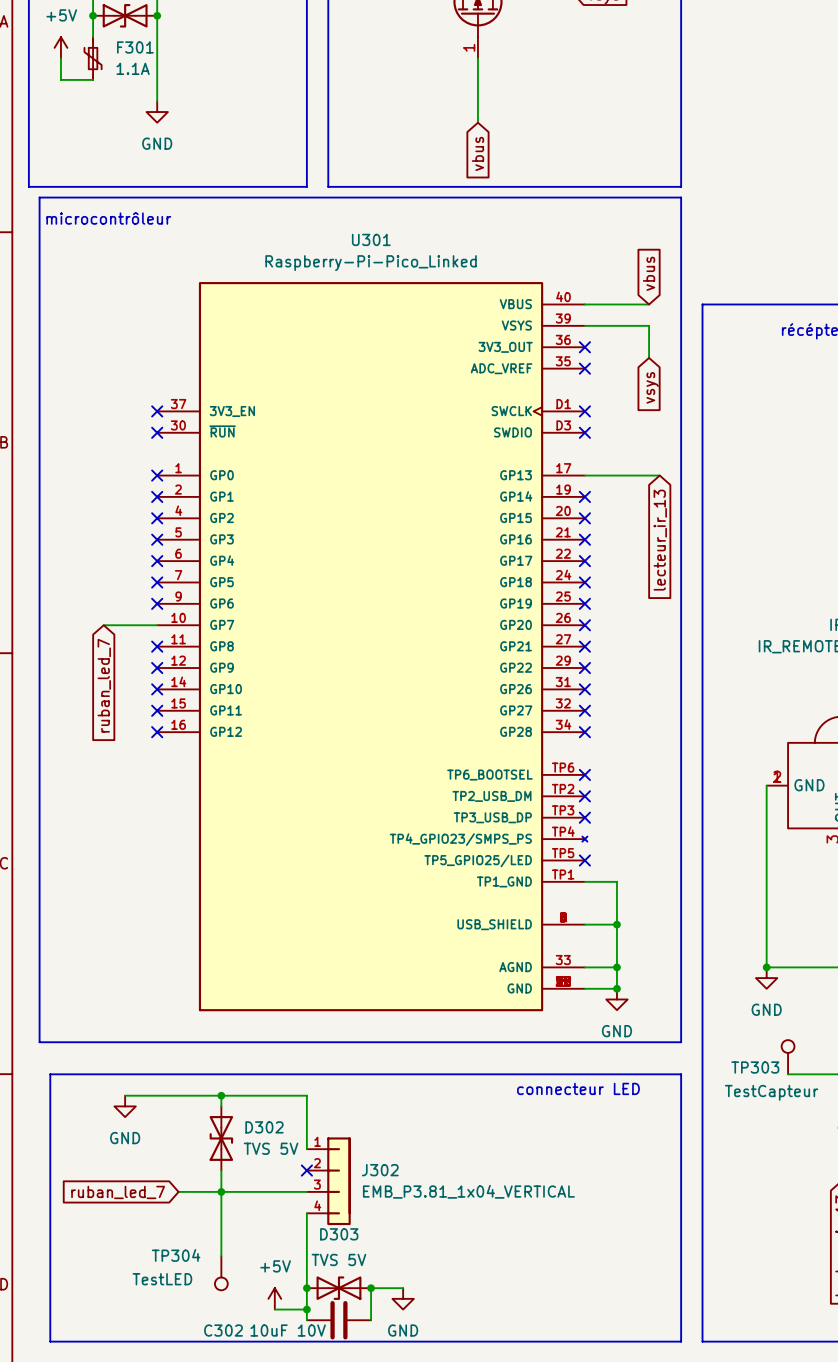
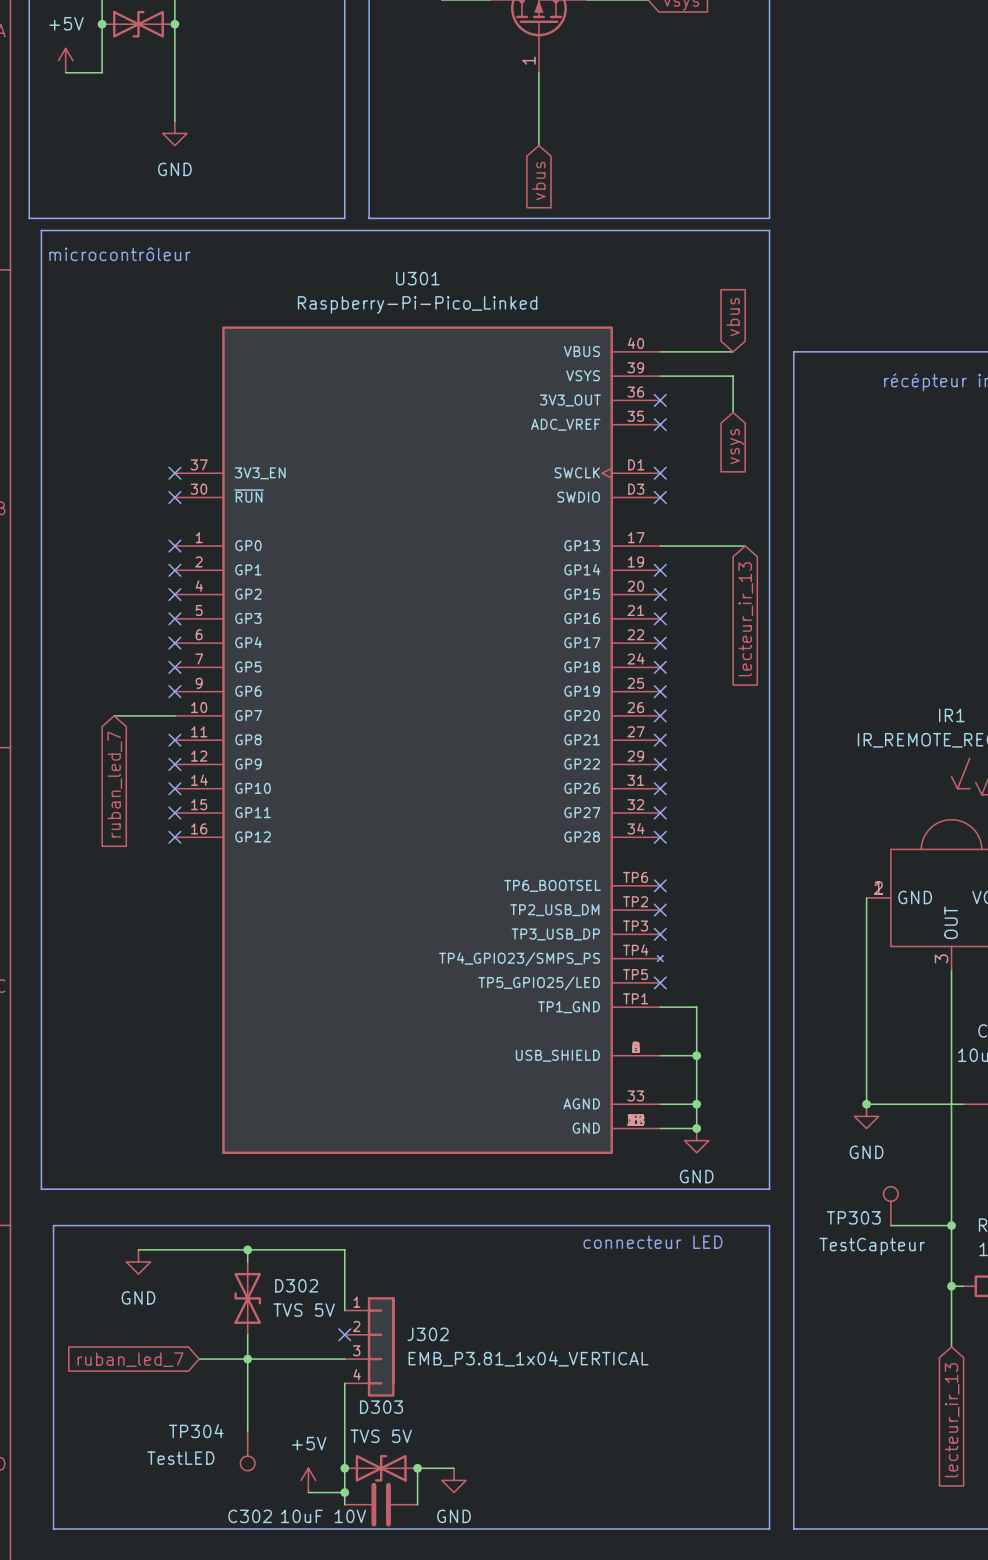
wire: (60, 58) (60, 79) (93, 79) -> (65, 72) (102, 72) (102, 48)
F301: 1.1A (93, 58) -> none

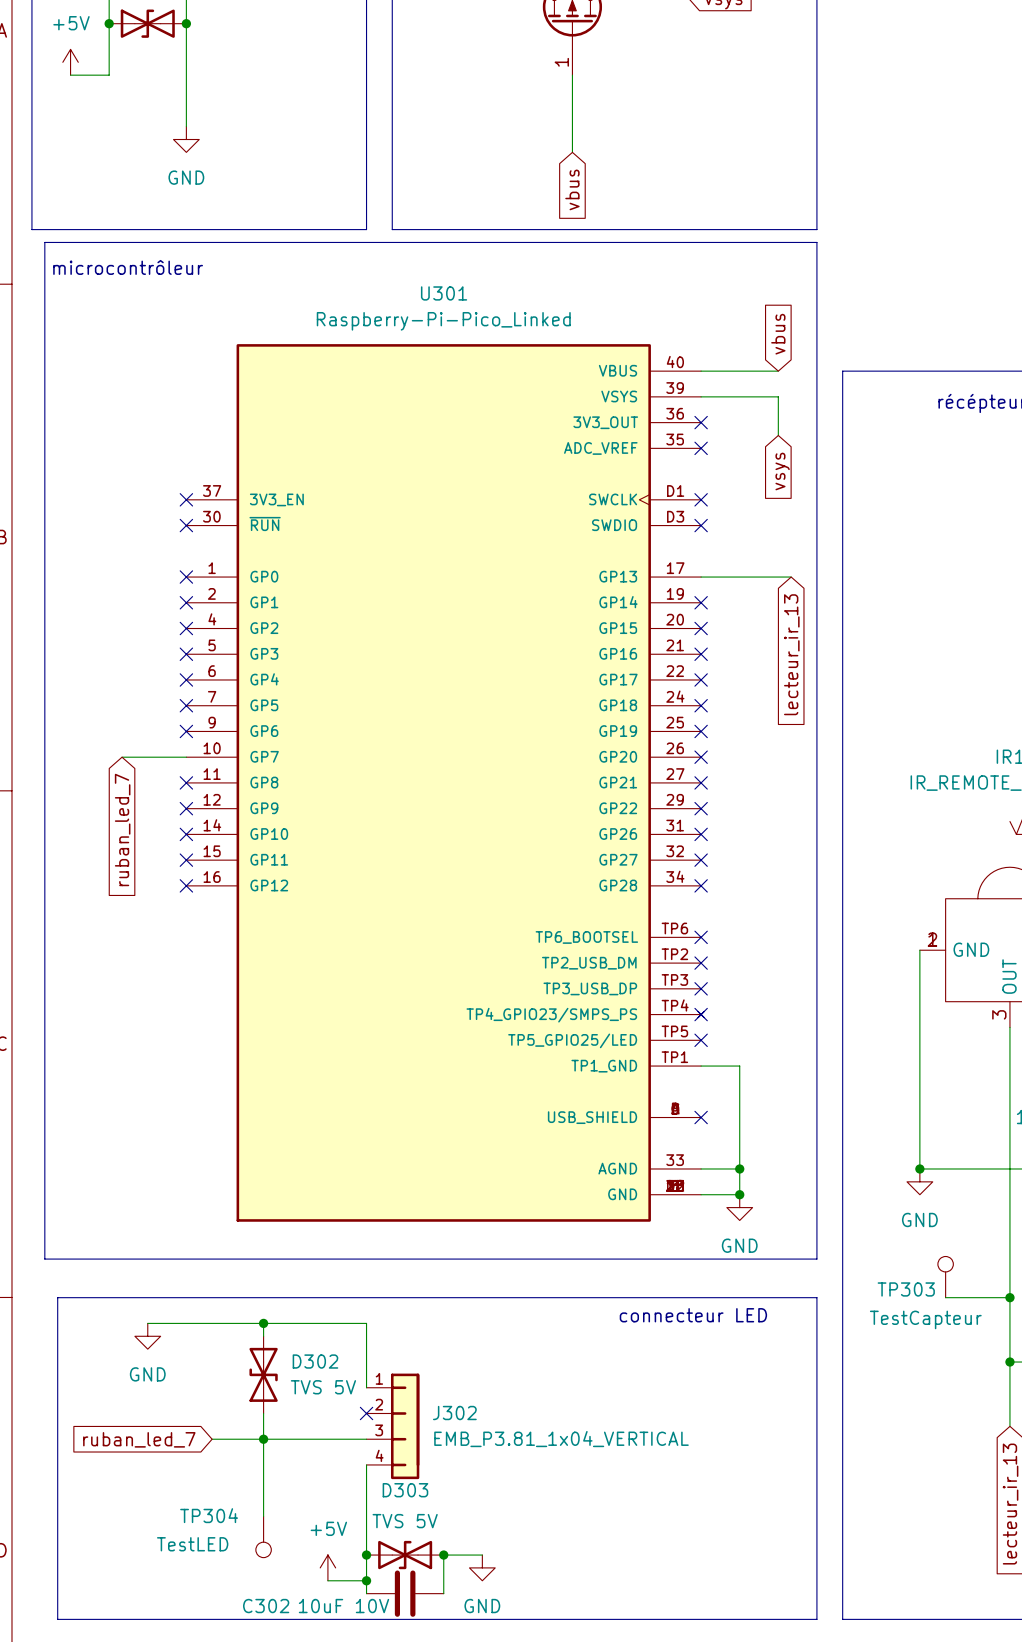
no-connect mark: none -> (701, 1014)
wire: (660, 1055) (696, 1055) -> none
no-connect mark: none -> (701, 1117)
junction: (696, 1055) -> none

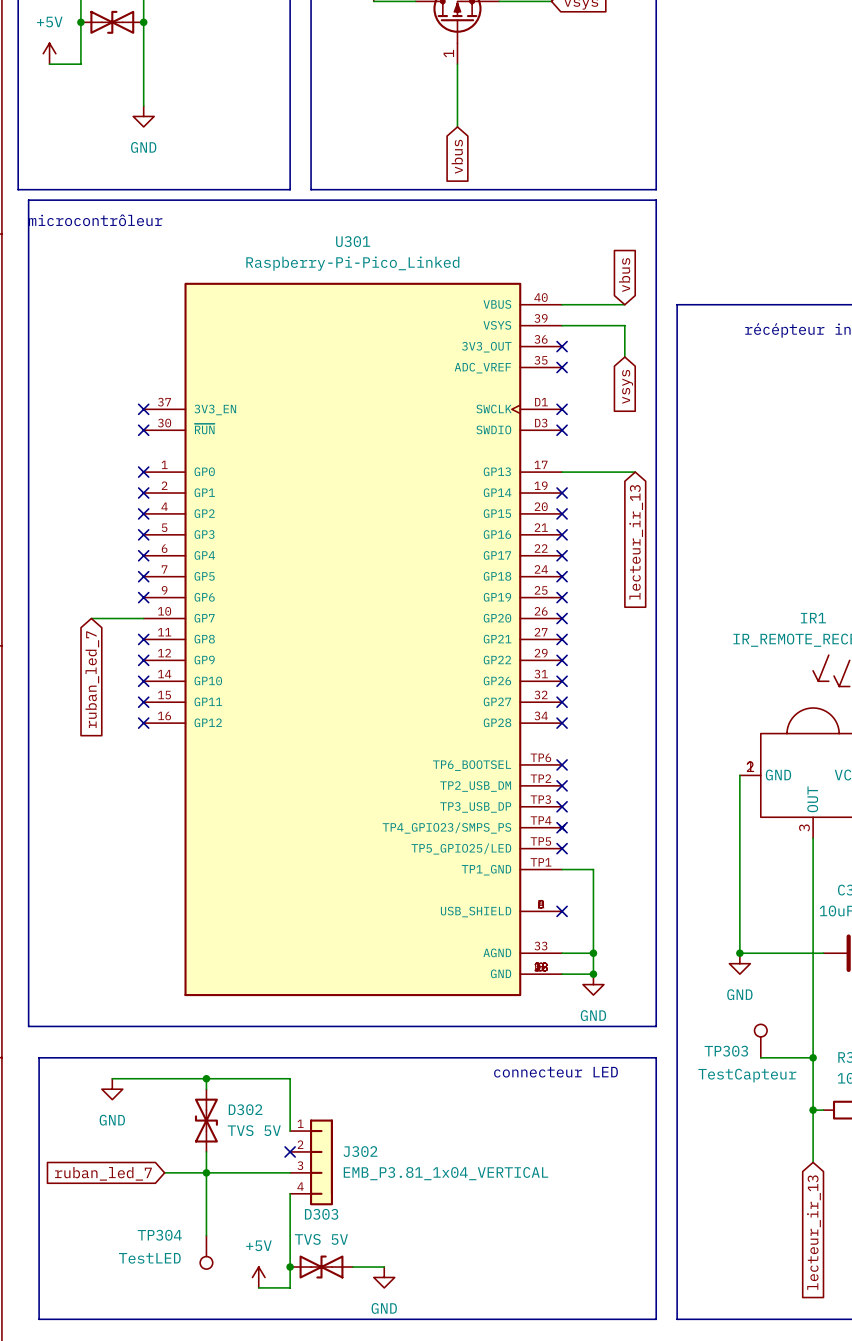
wire: (443, 1555) (443, 1593) -> none
junction: (443, 1555) -> none
wire: (366, 1580) (366, 1593) -> none
junction: (366, 1580) -> none
C302: 10uF 10V (405, 1593) -> none

